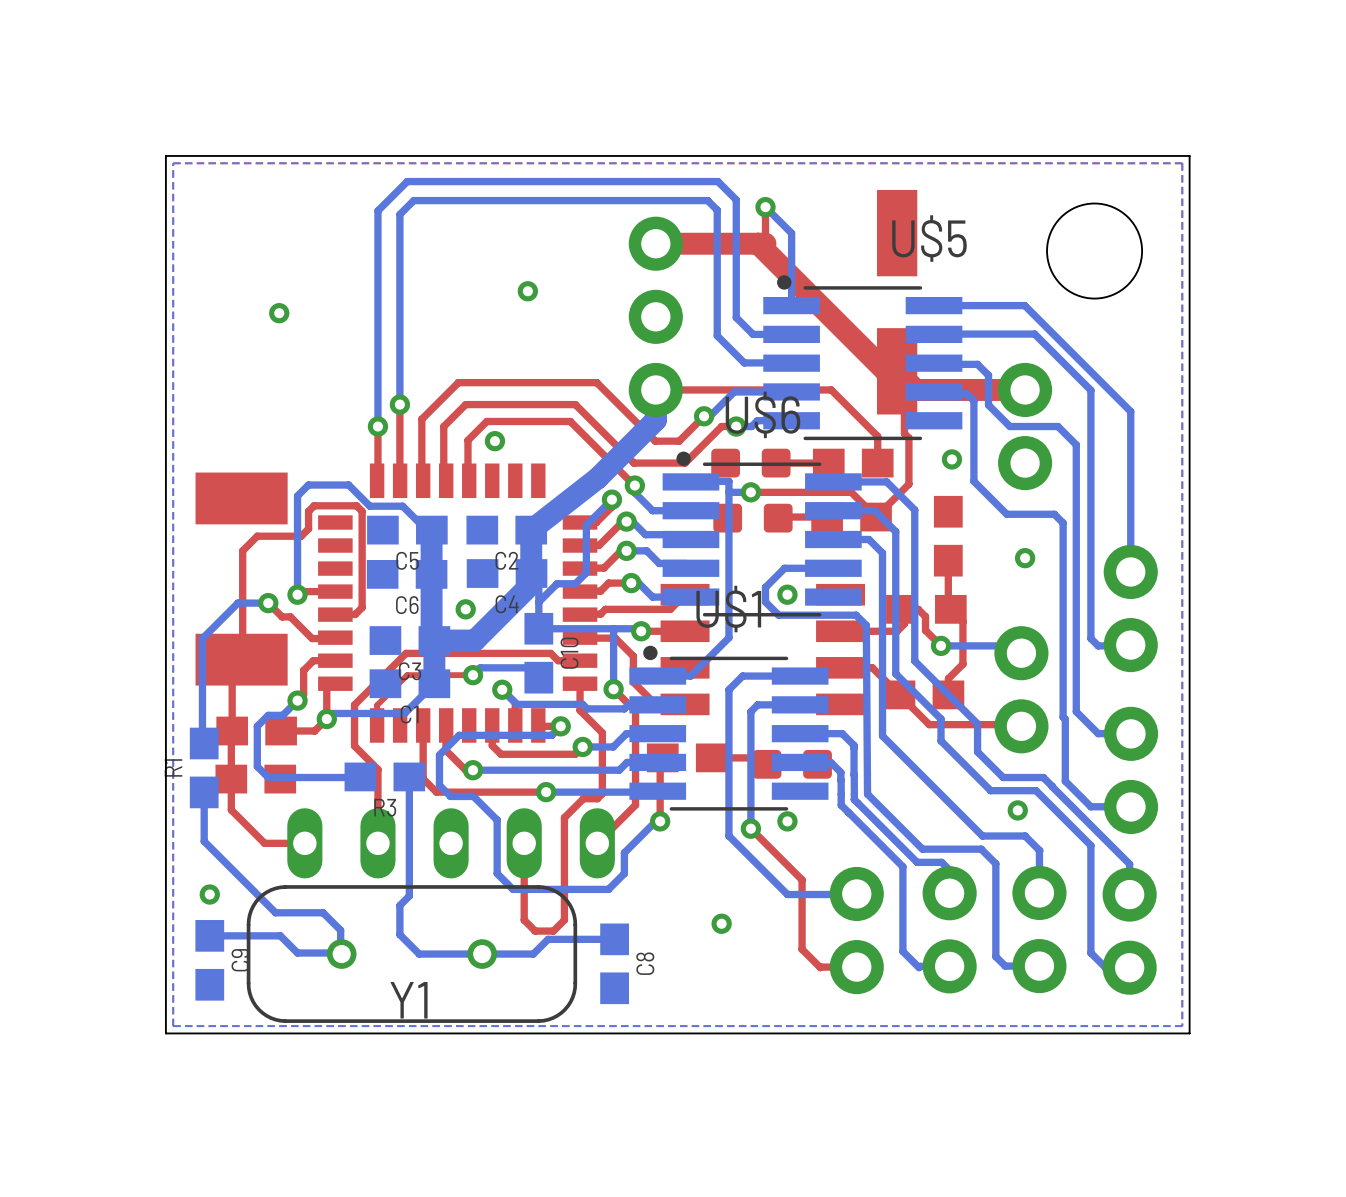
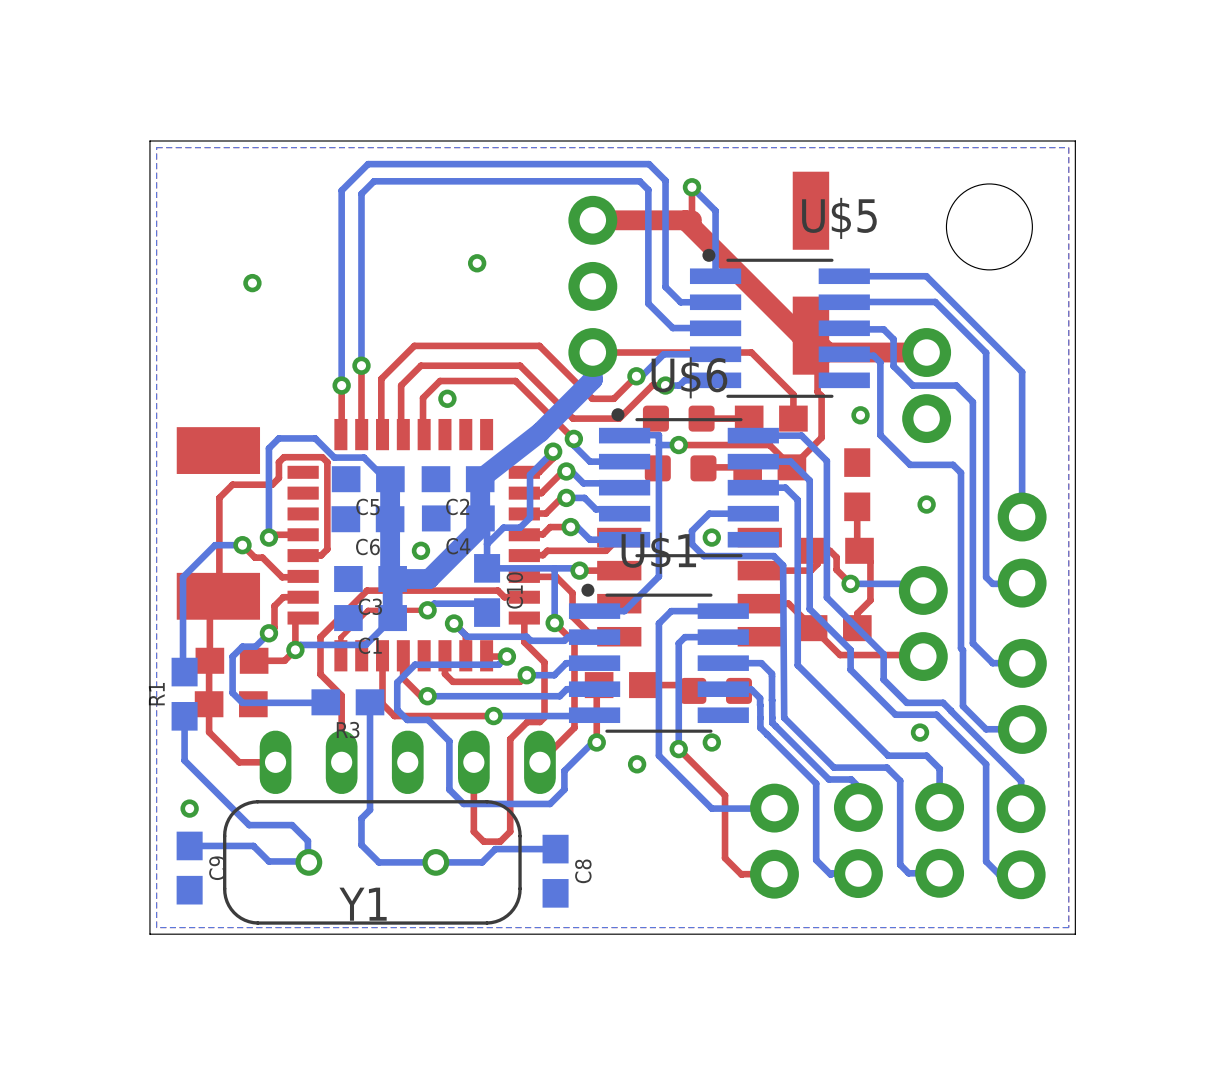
via position: (721, 923) -> (637, 764)

